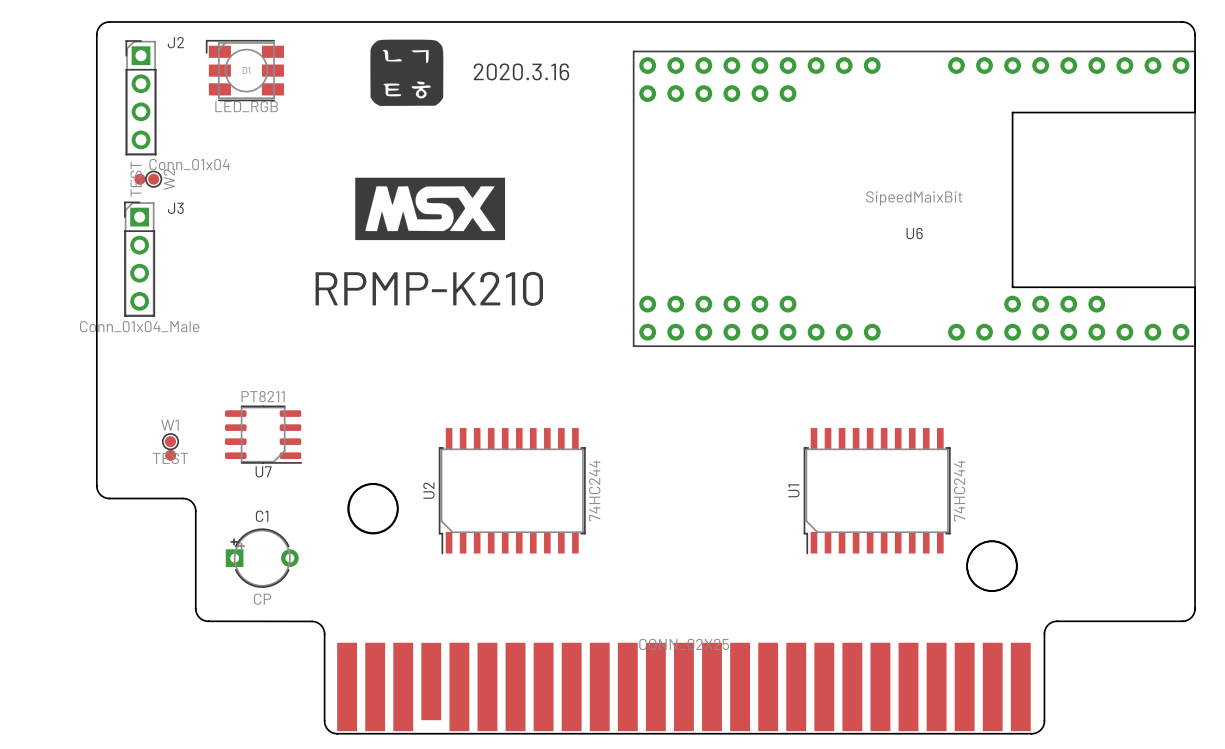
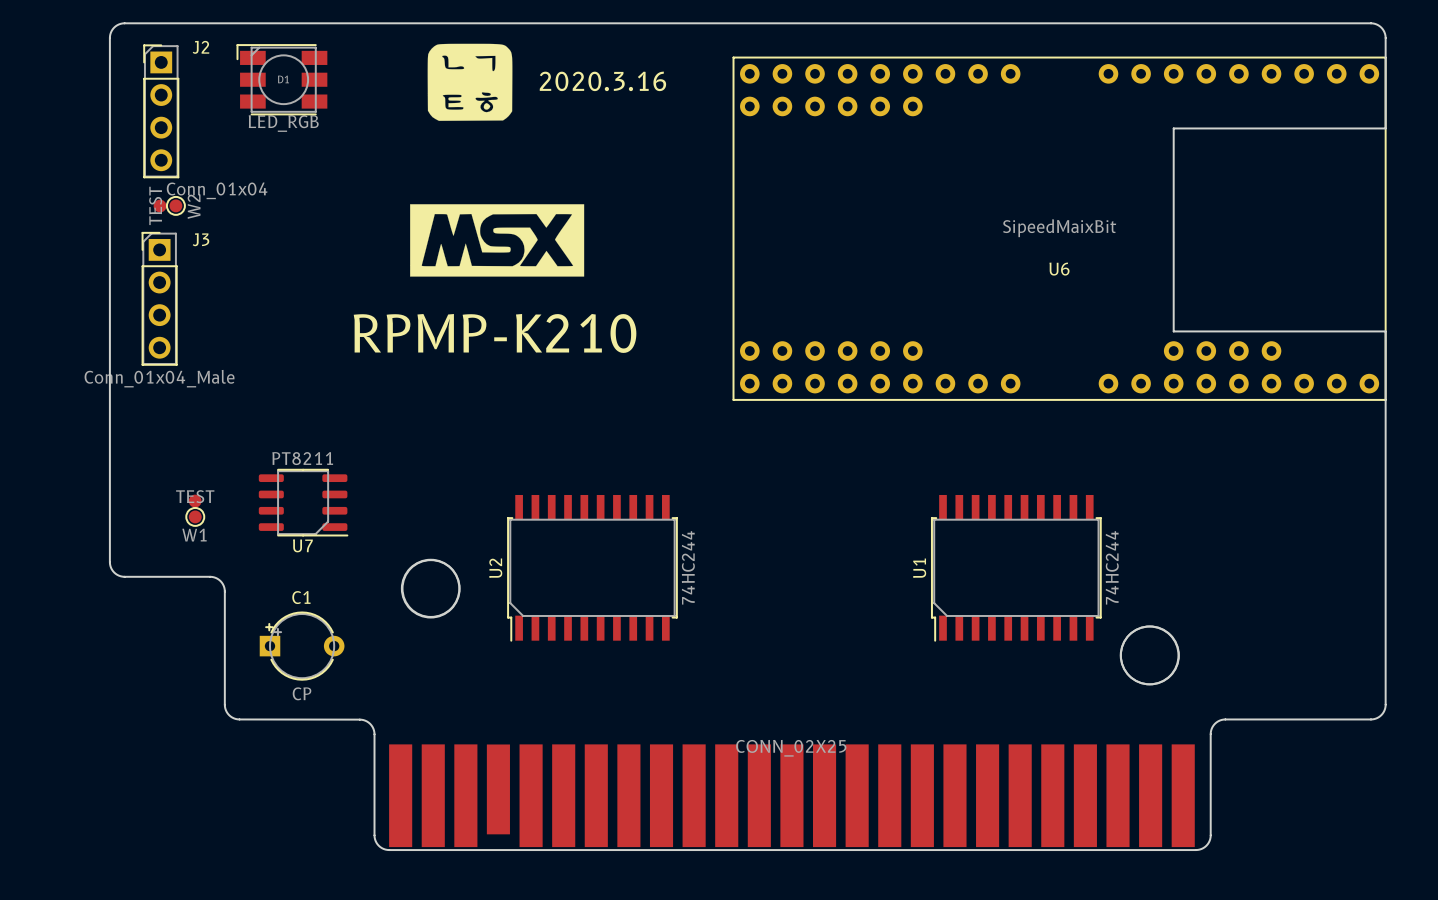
W1 rotation: 0° (170, 447) -> 180° (195, 510)

